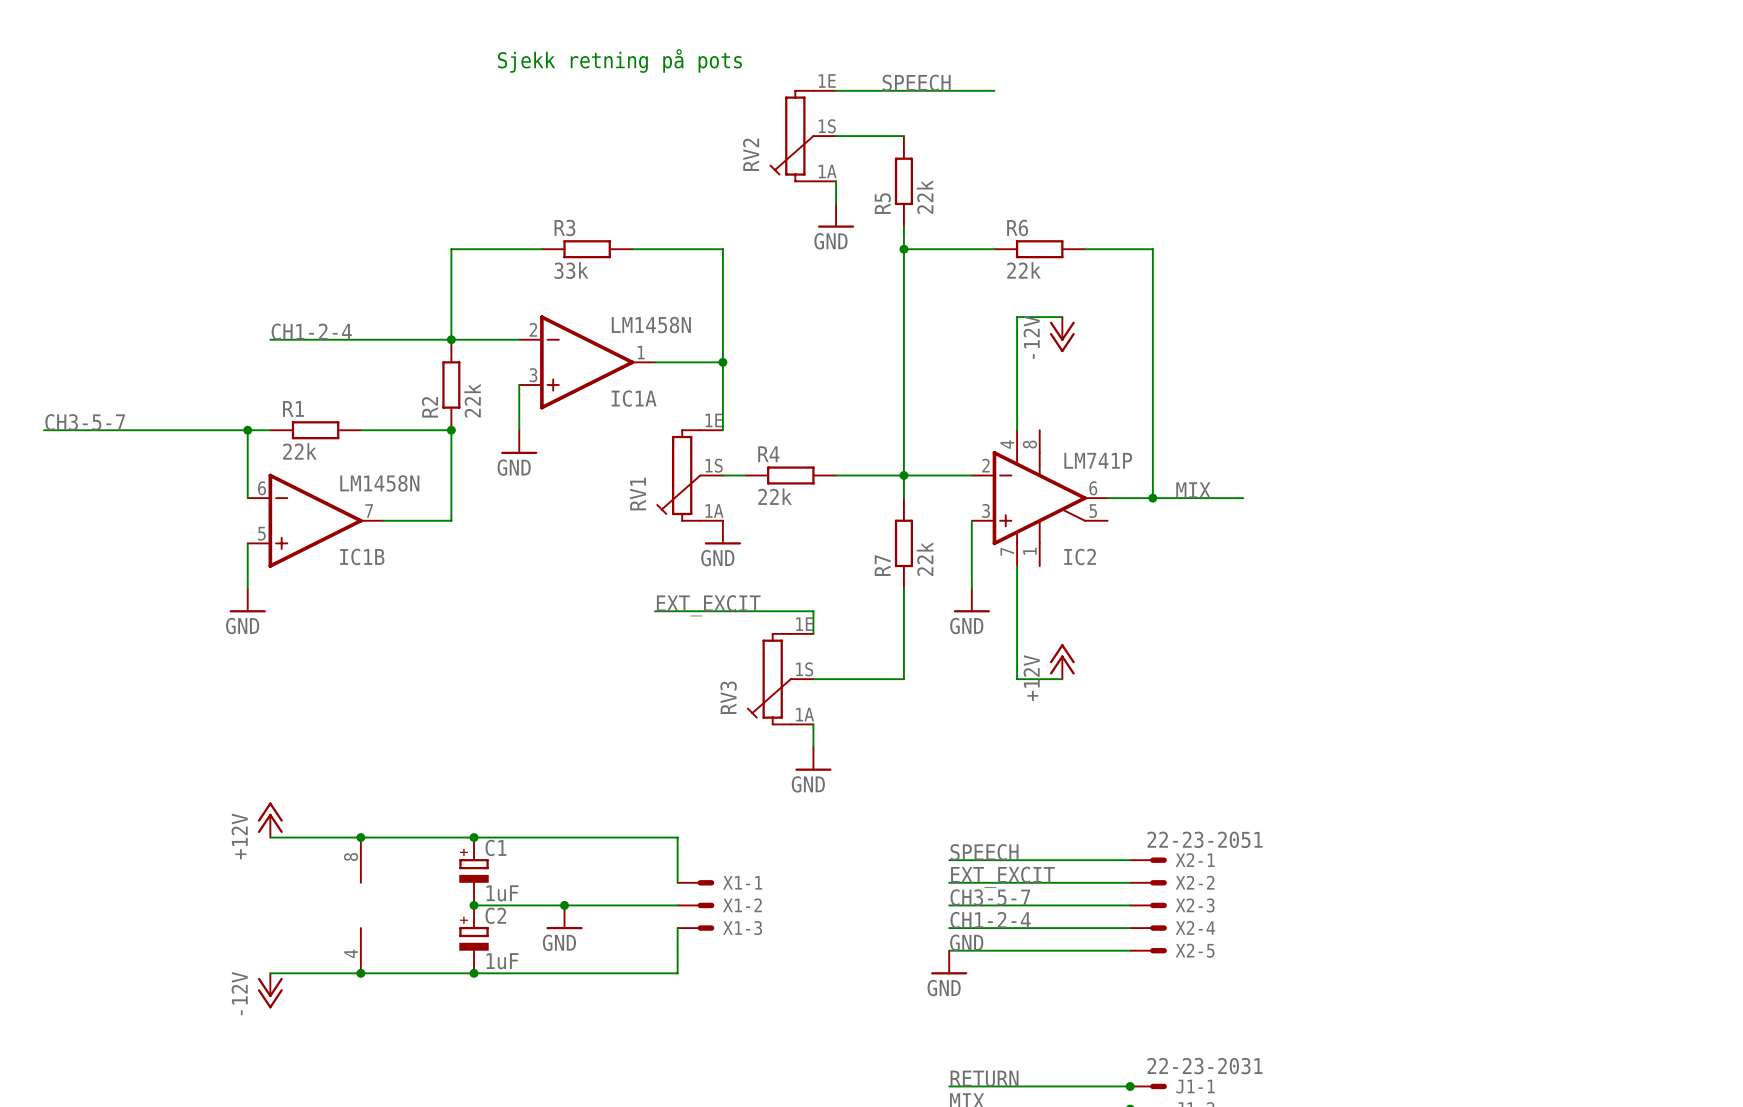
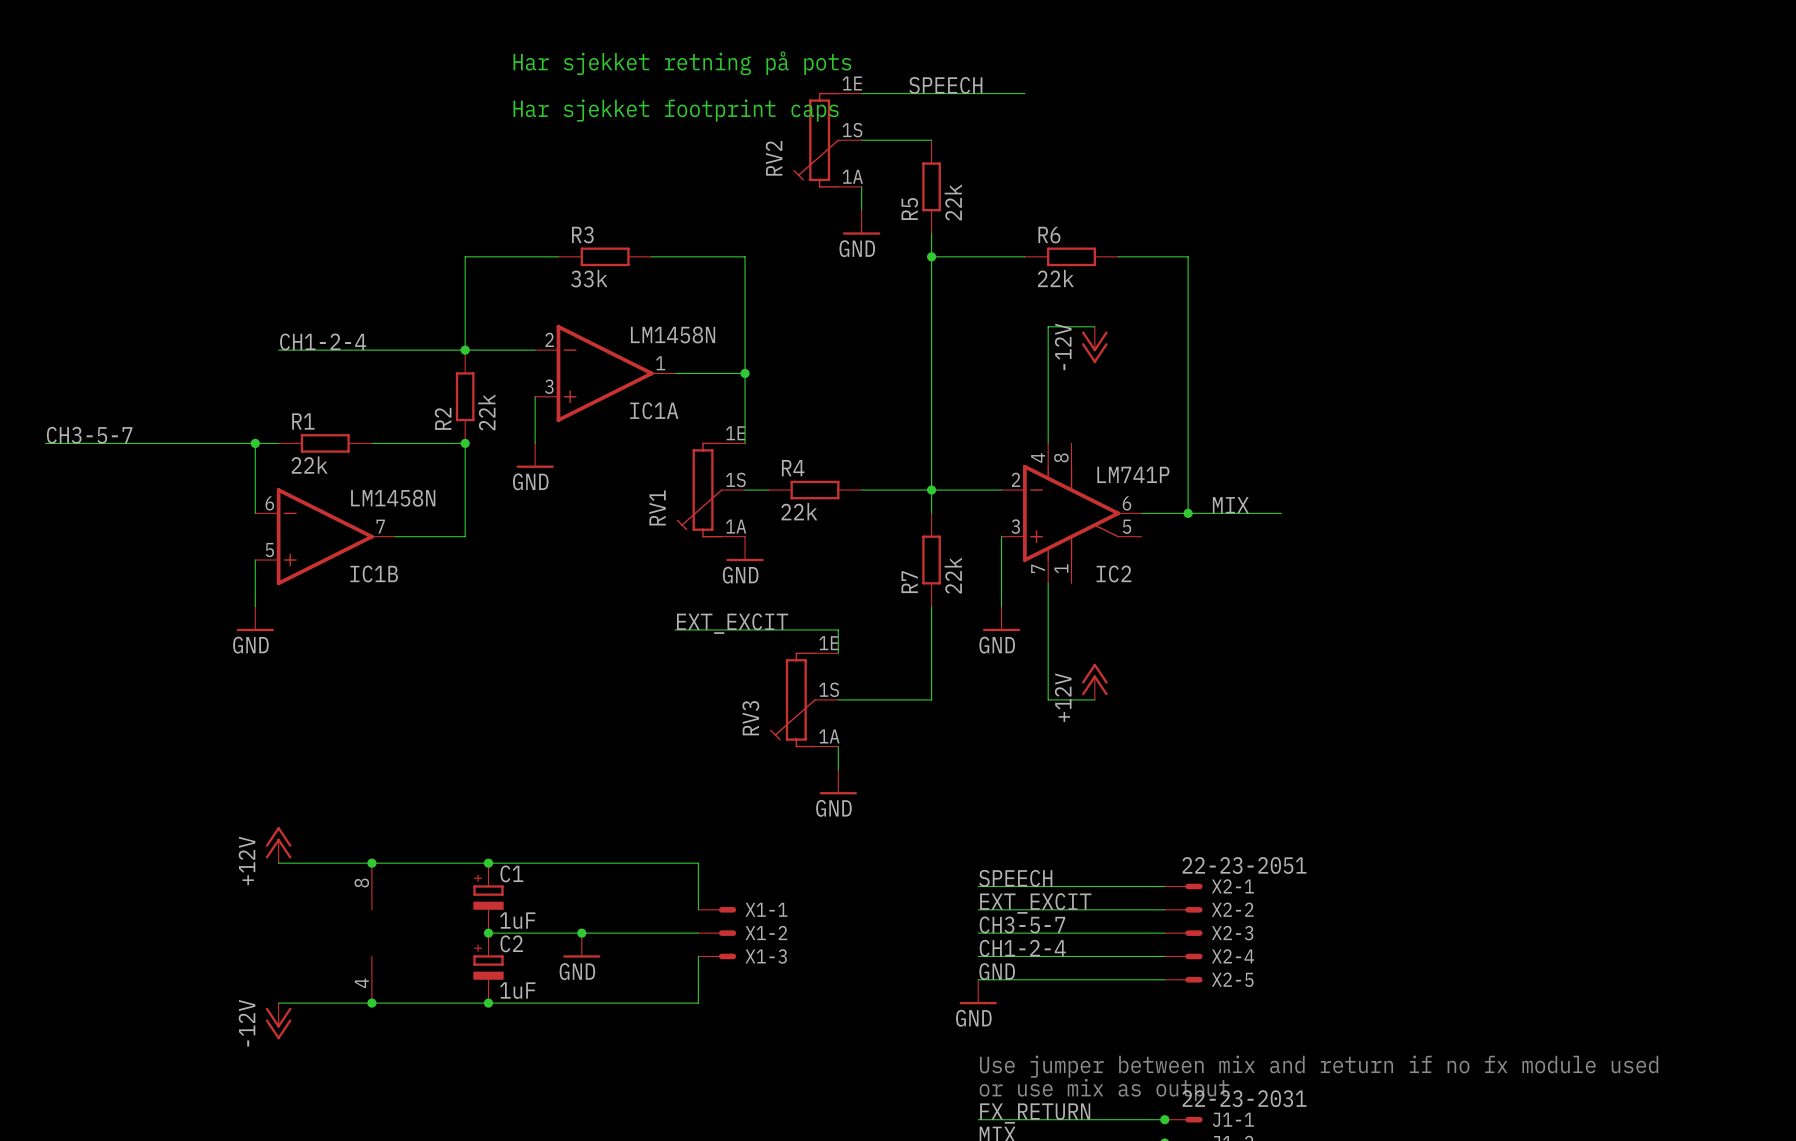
text: Sjekk retning på pots (619, 60) -> Har sjekket retning på pots (682, 63)
text: none -> Har sjekket footprint caps (676, 110)
text: none -> Use jumper between mix and return if no fx module used (1319, 1066)
text: none -> or use mix as output (1104, 1089)
label: RETURN (984, 1078) -> FX_RETURN (1035, 1113)

